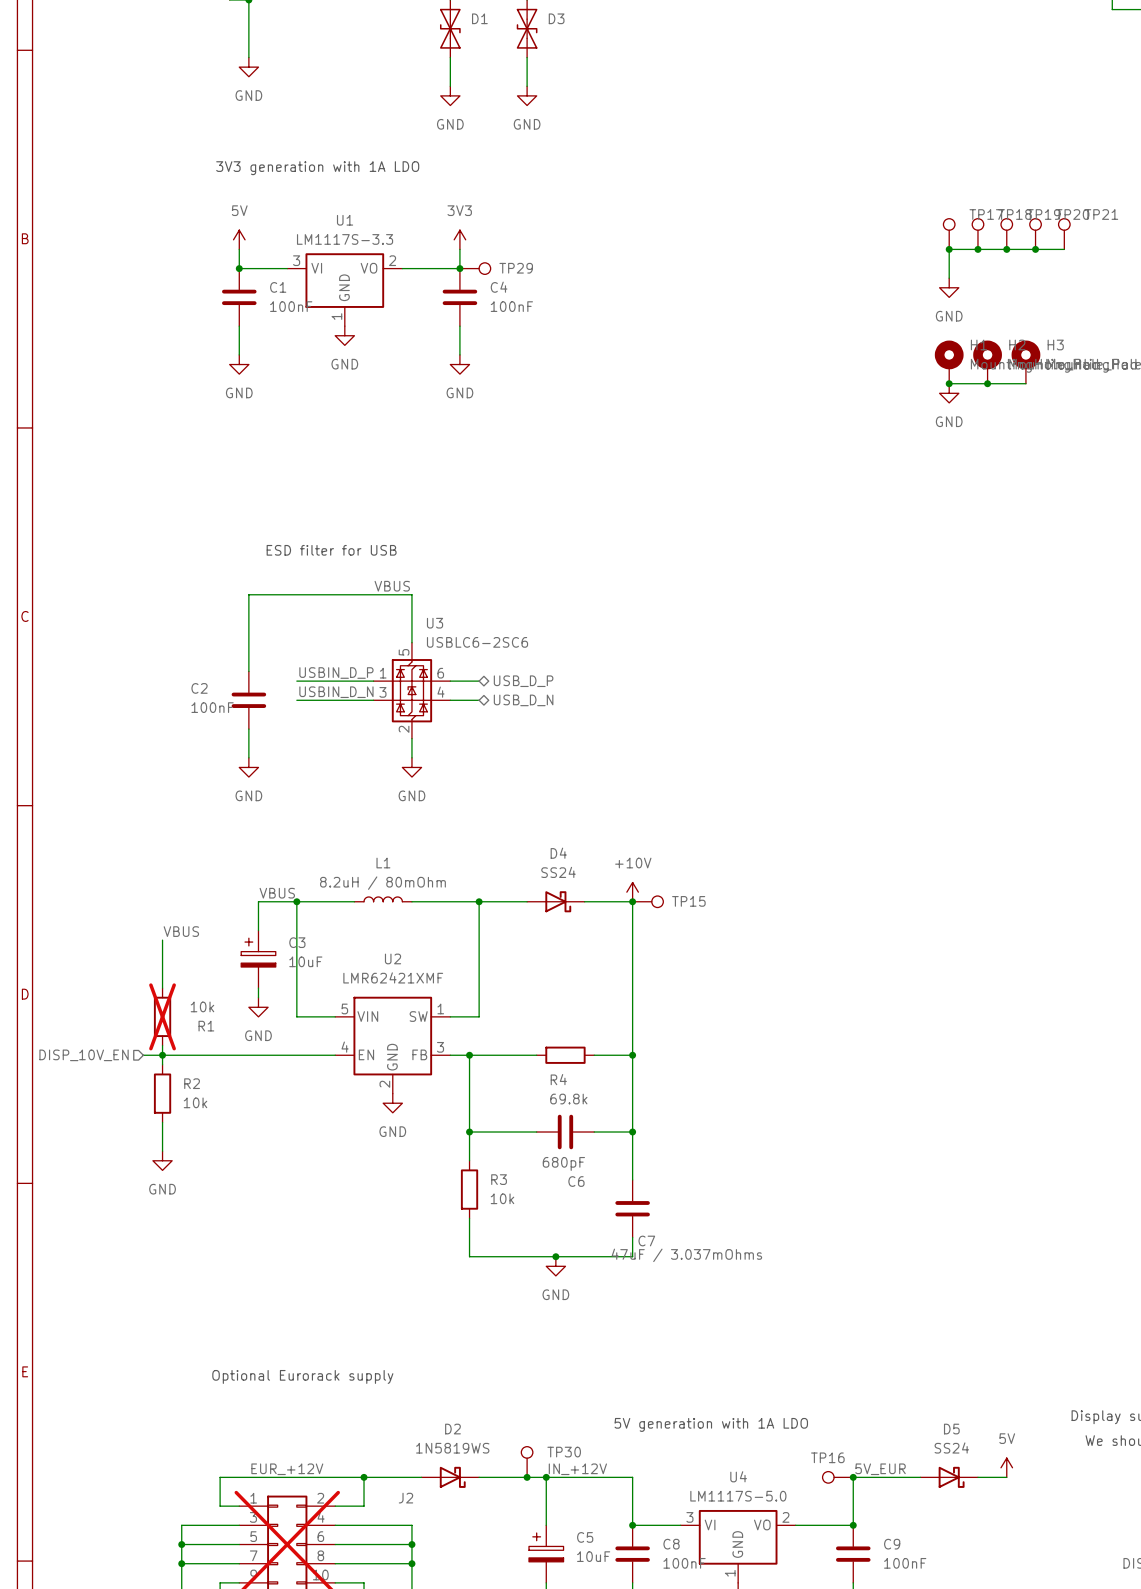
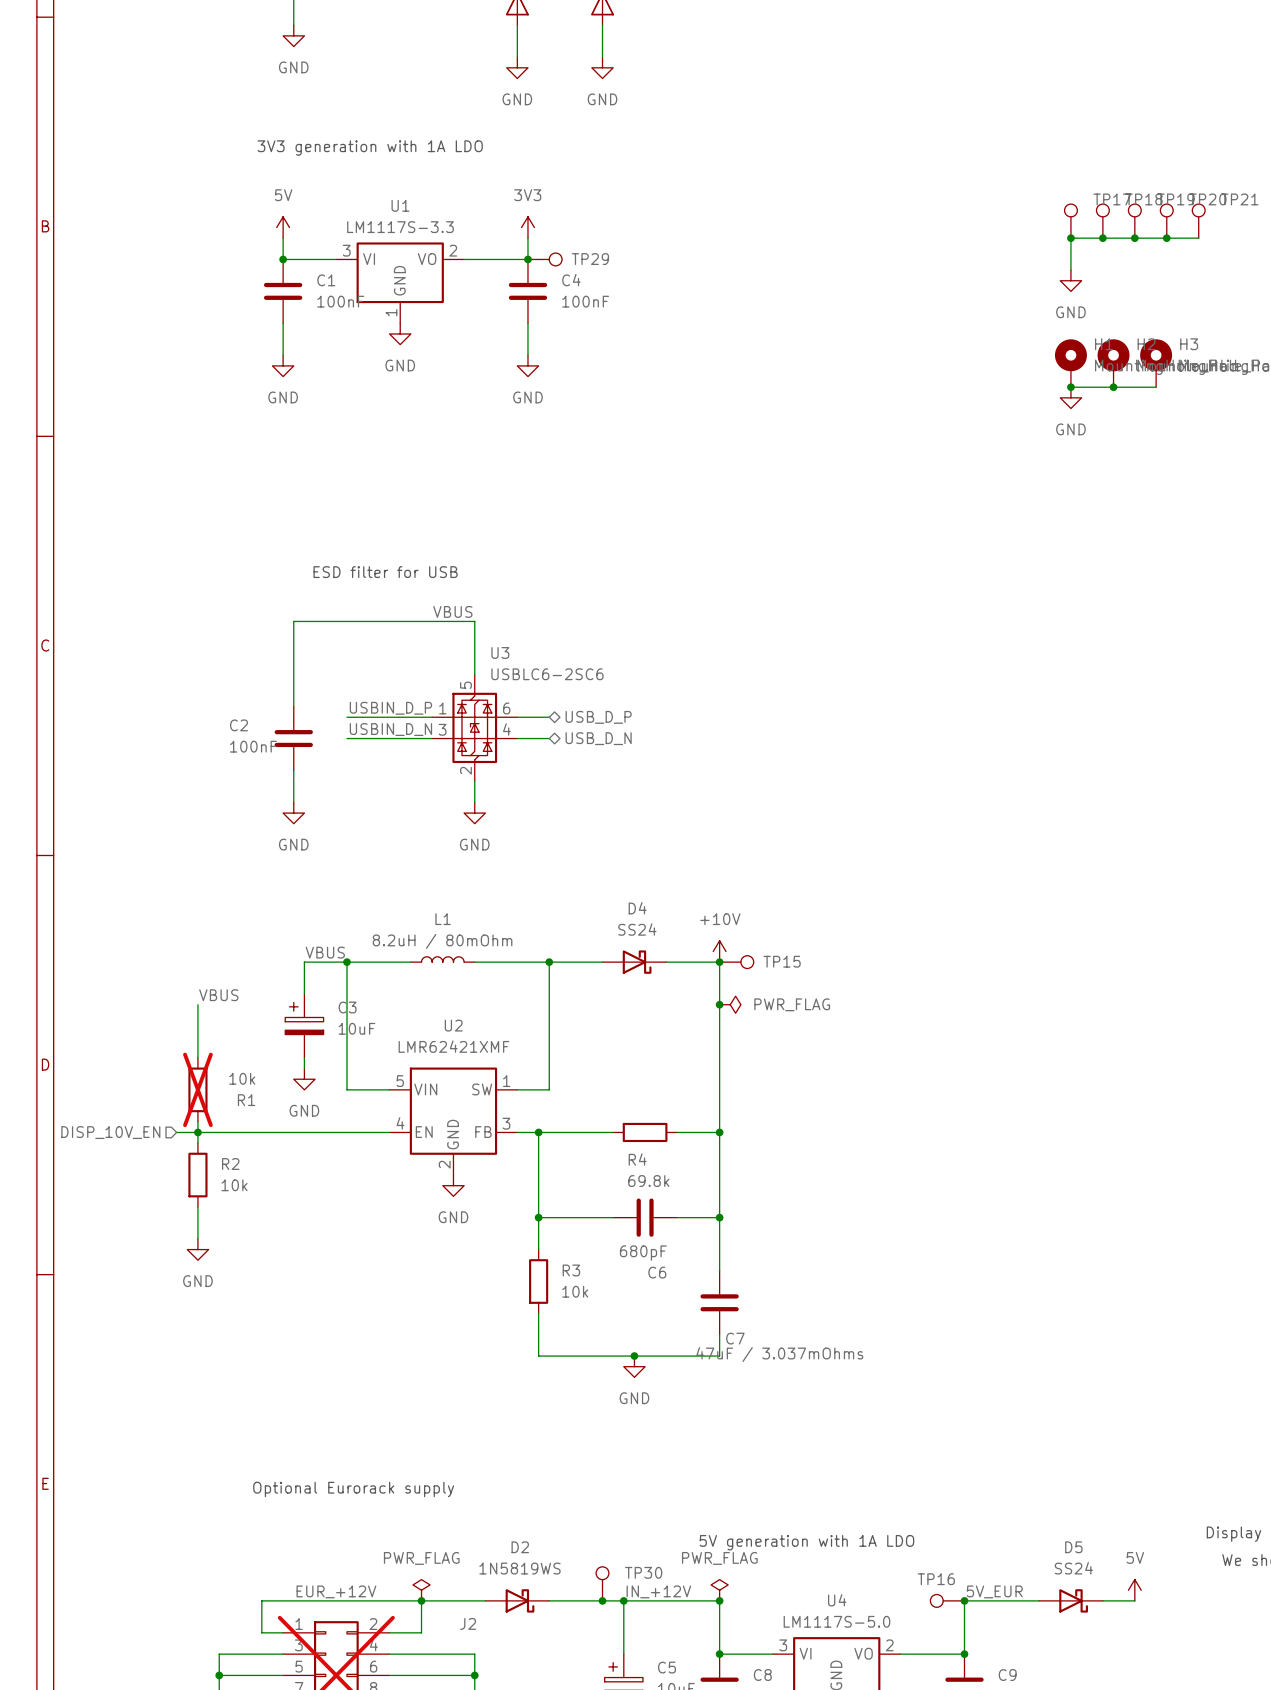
junction: none -> (719, 1004)
power symbol: none -> PWR_FLAG (730, 1004)
power symbol: none -> PWR_FLAG (421, 1590)
power symbol: none -> PWR_FLAG (719, 1590)
junction: none -> (719, 1600)

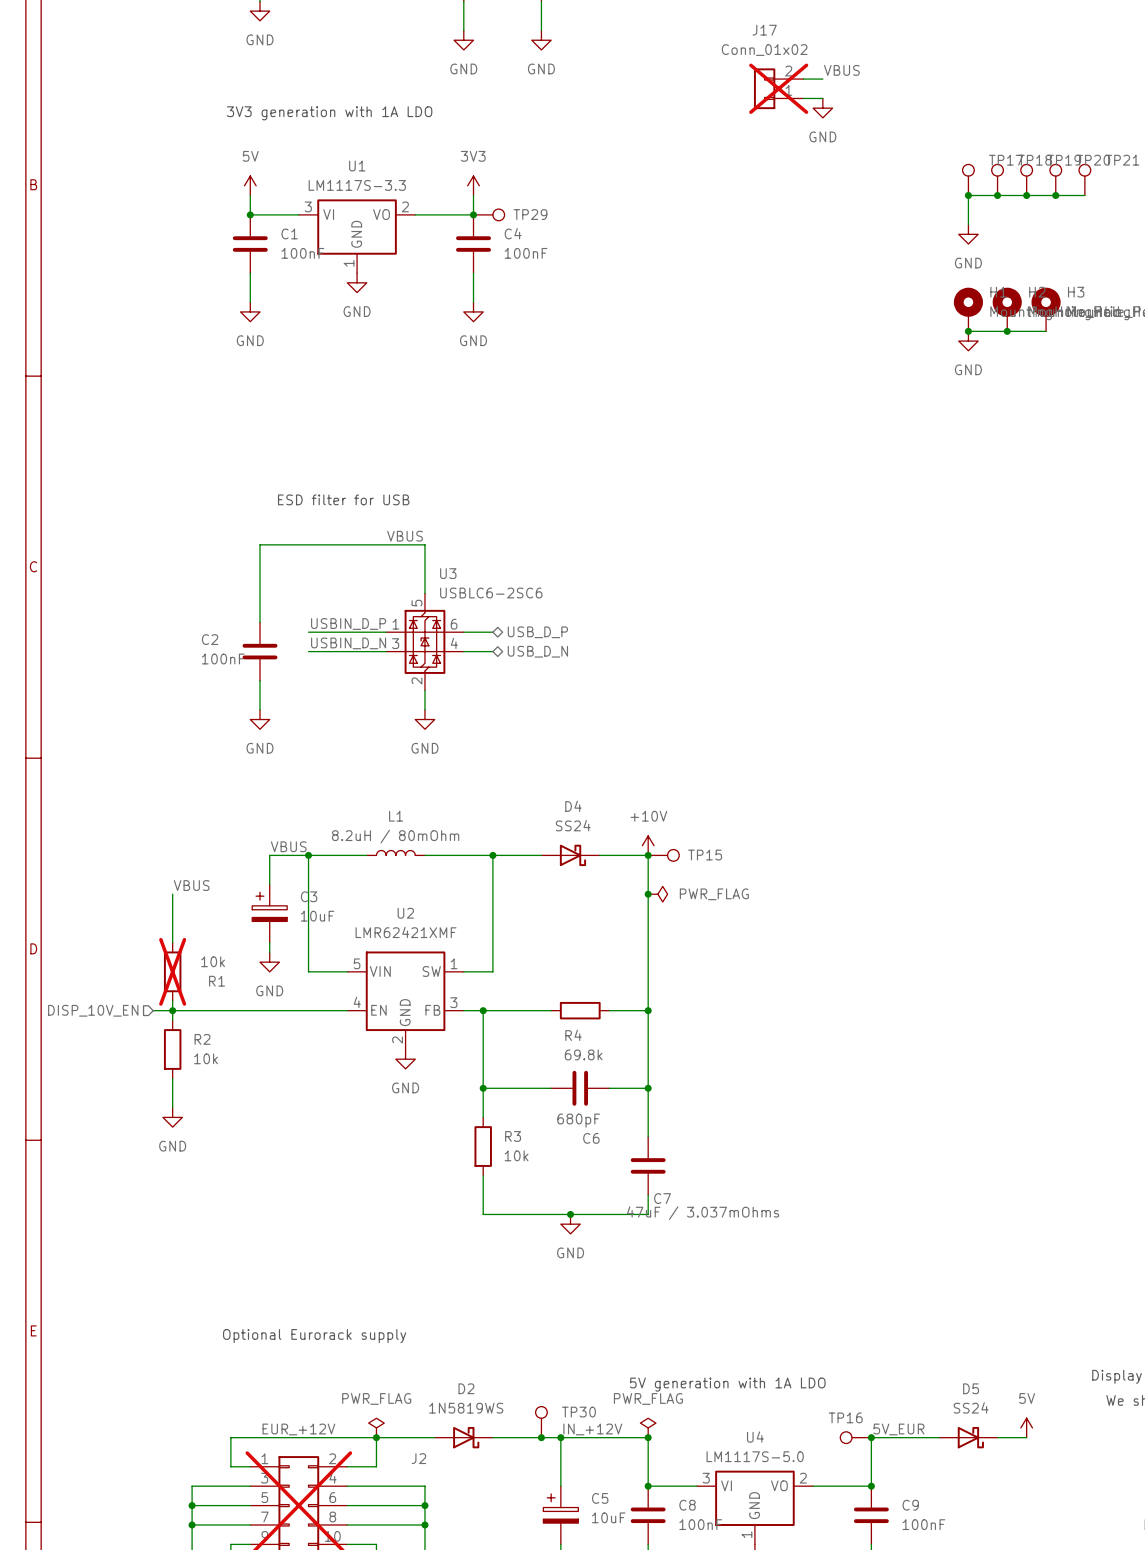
label: none -> VBUS (841, 70)
wire: none -> (803, 79) (822, 79)
J17: none -> Conn_01x02 (778, 88)
wire: none -> (803, 98) (822, 98)
power symbol: none -> GND (822, 108)

